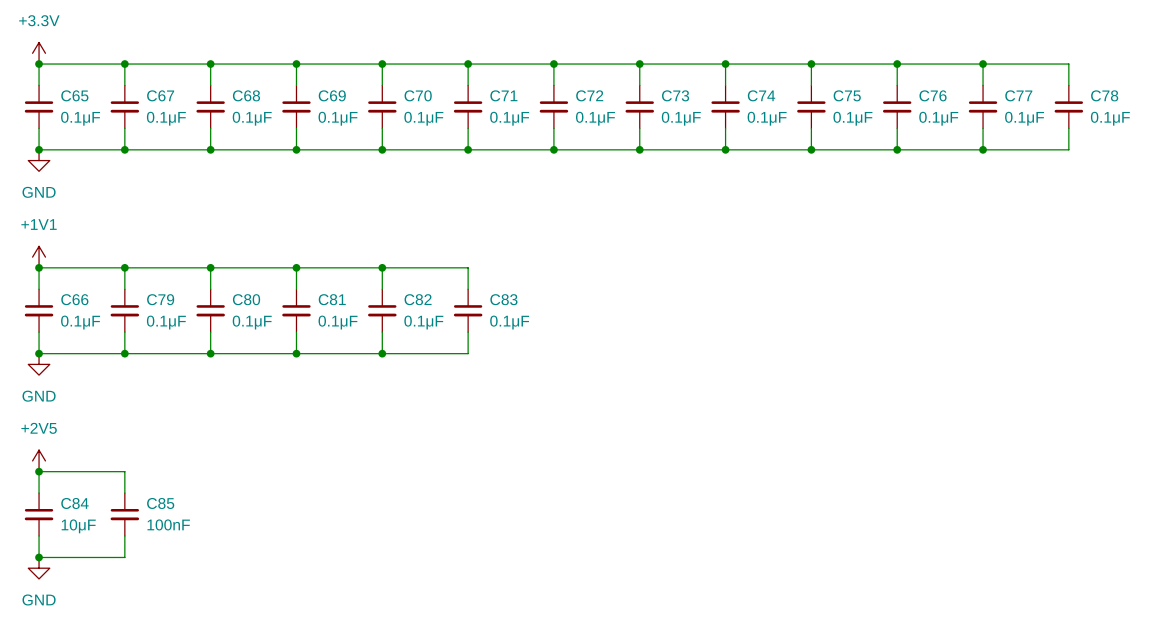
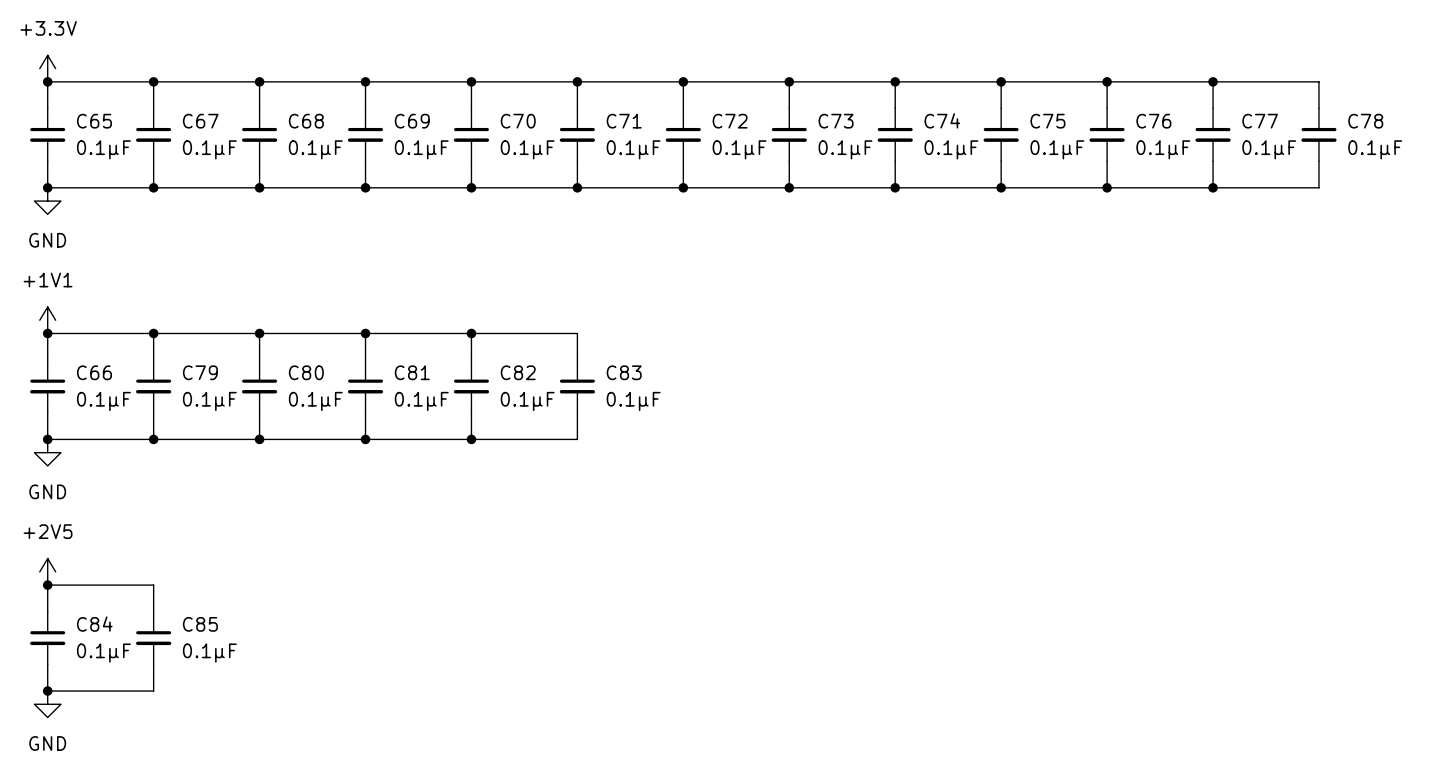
C85 value: 100nF (168, 524) -> 0.1μF (209, 653)
C84 value: 10μF (78, 526) -> 0.1μF (103, 653)

